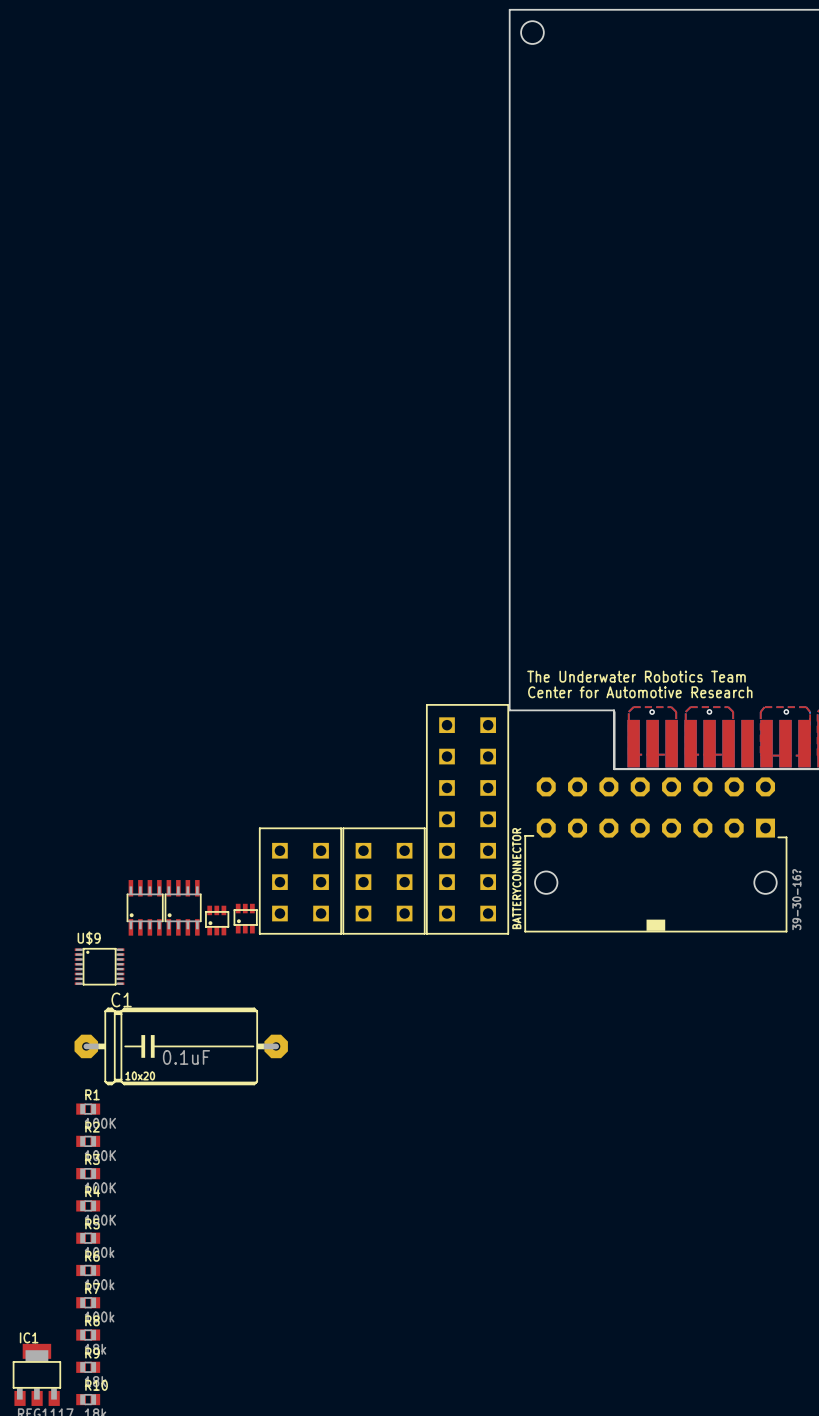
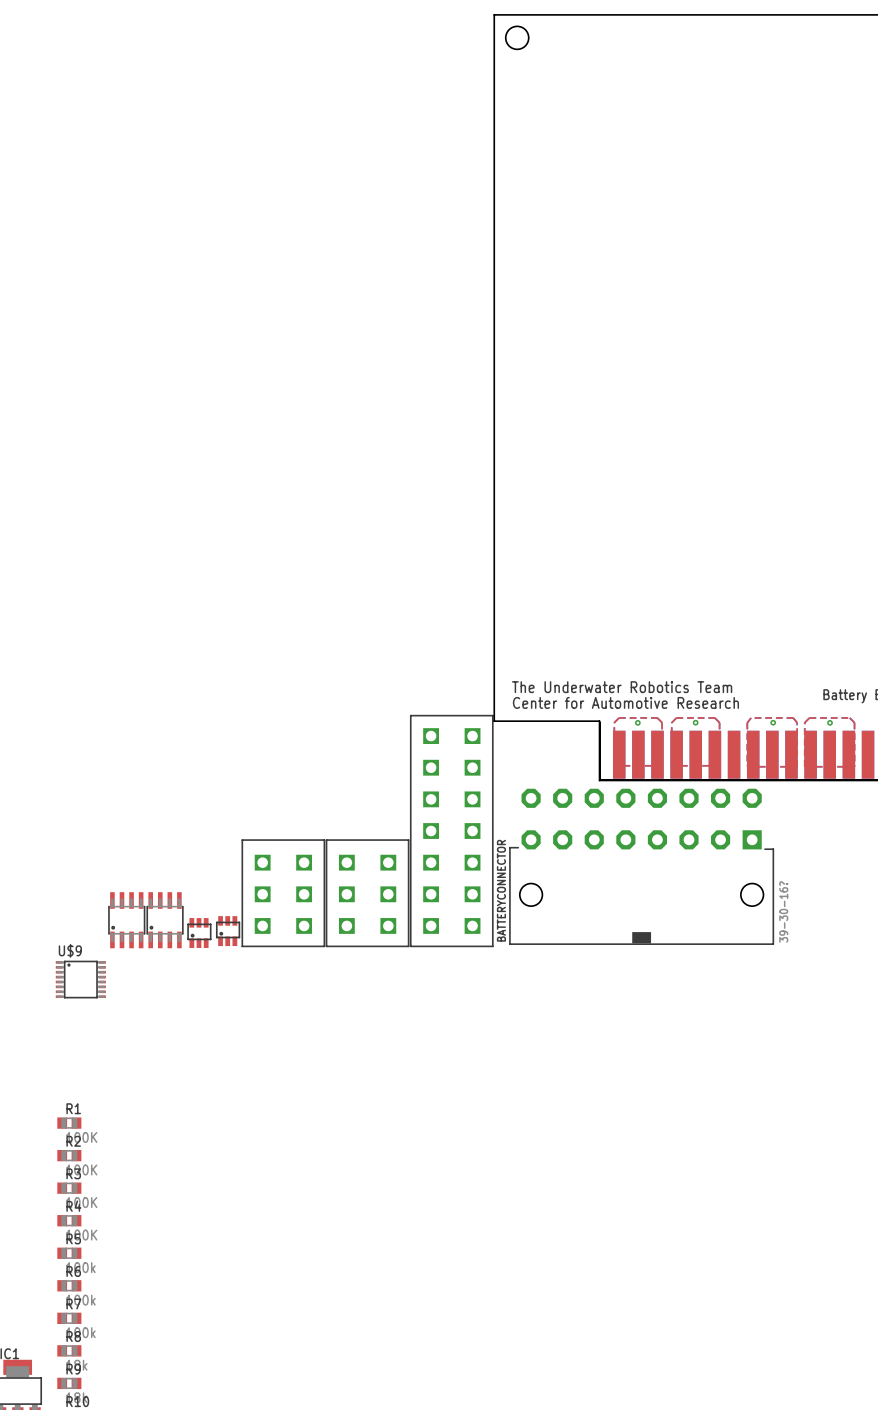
C1: 0.1uF (181, 1046) -> none

